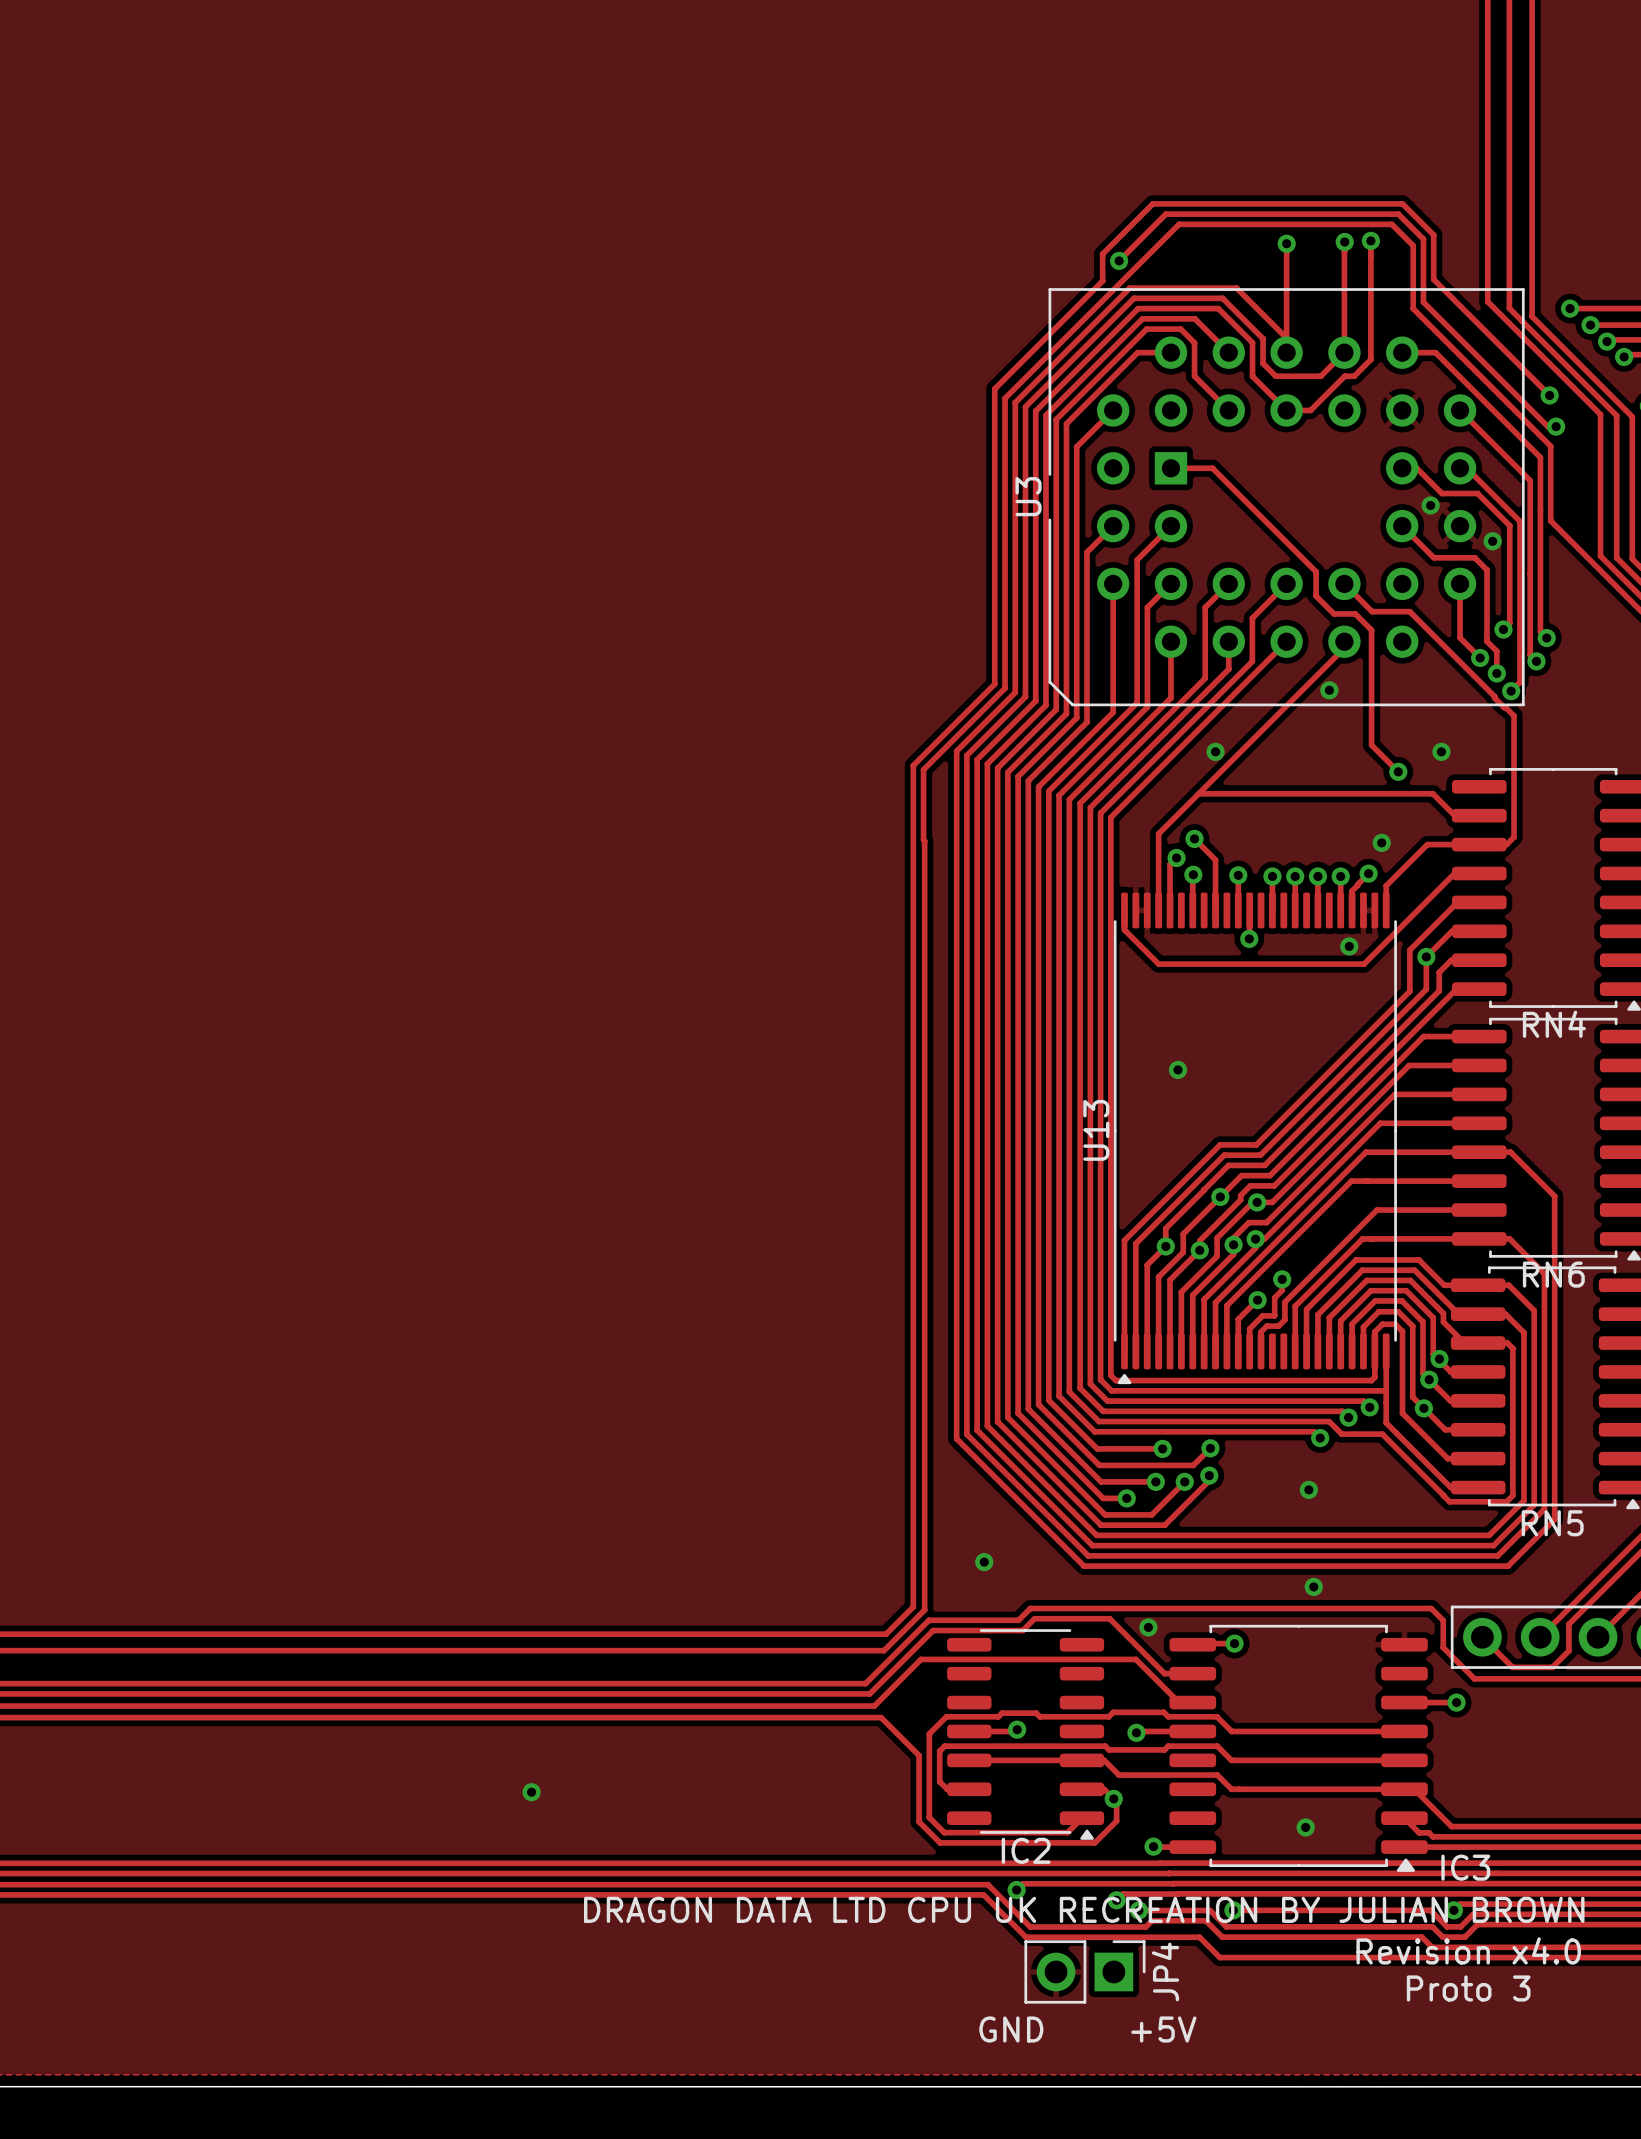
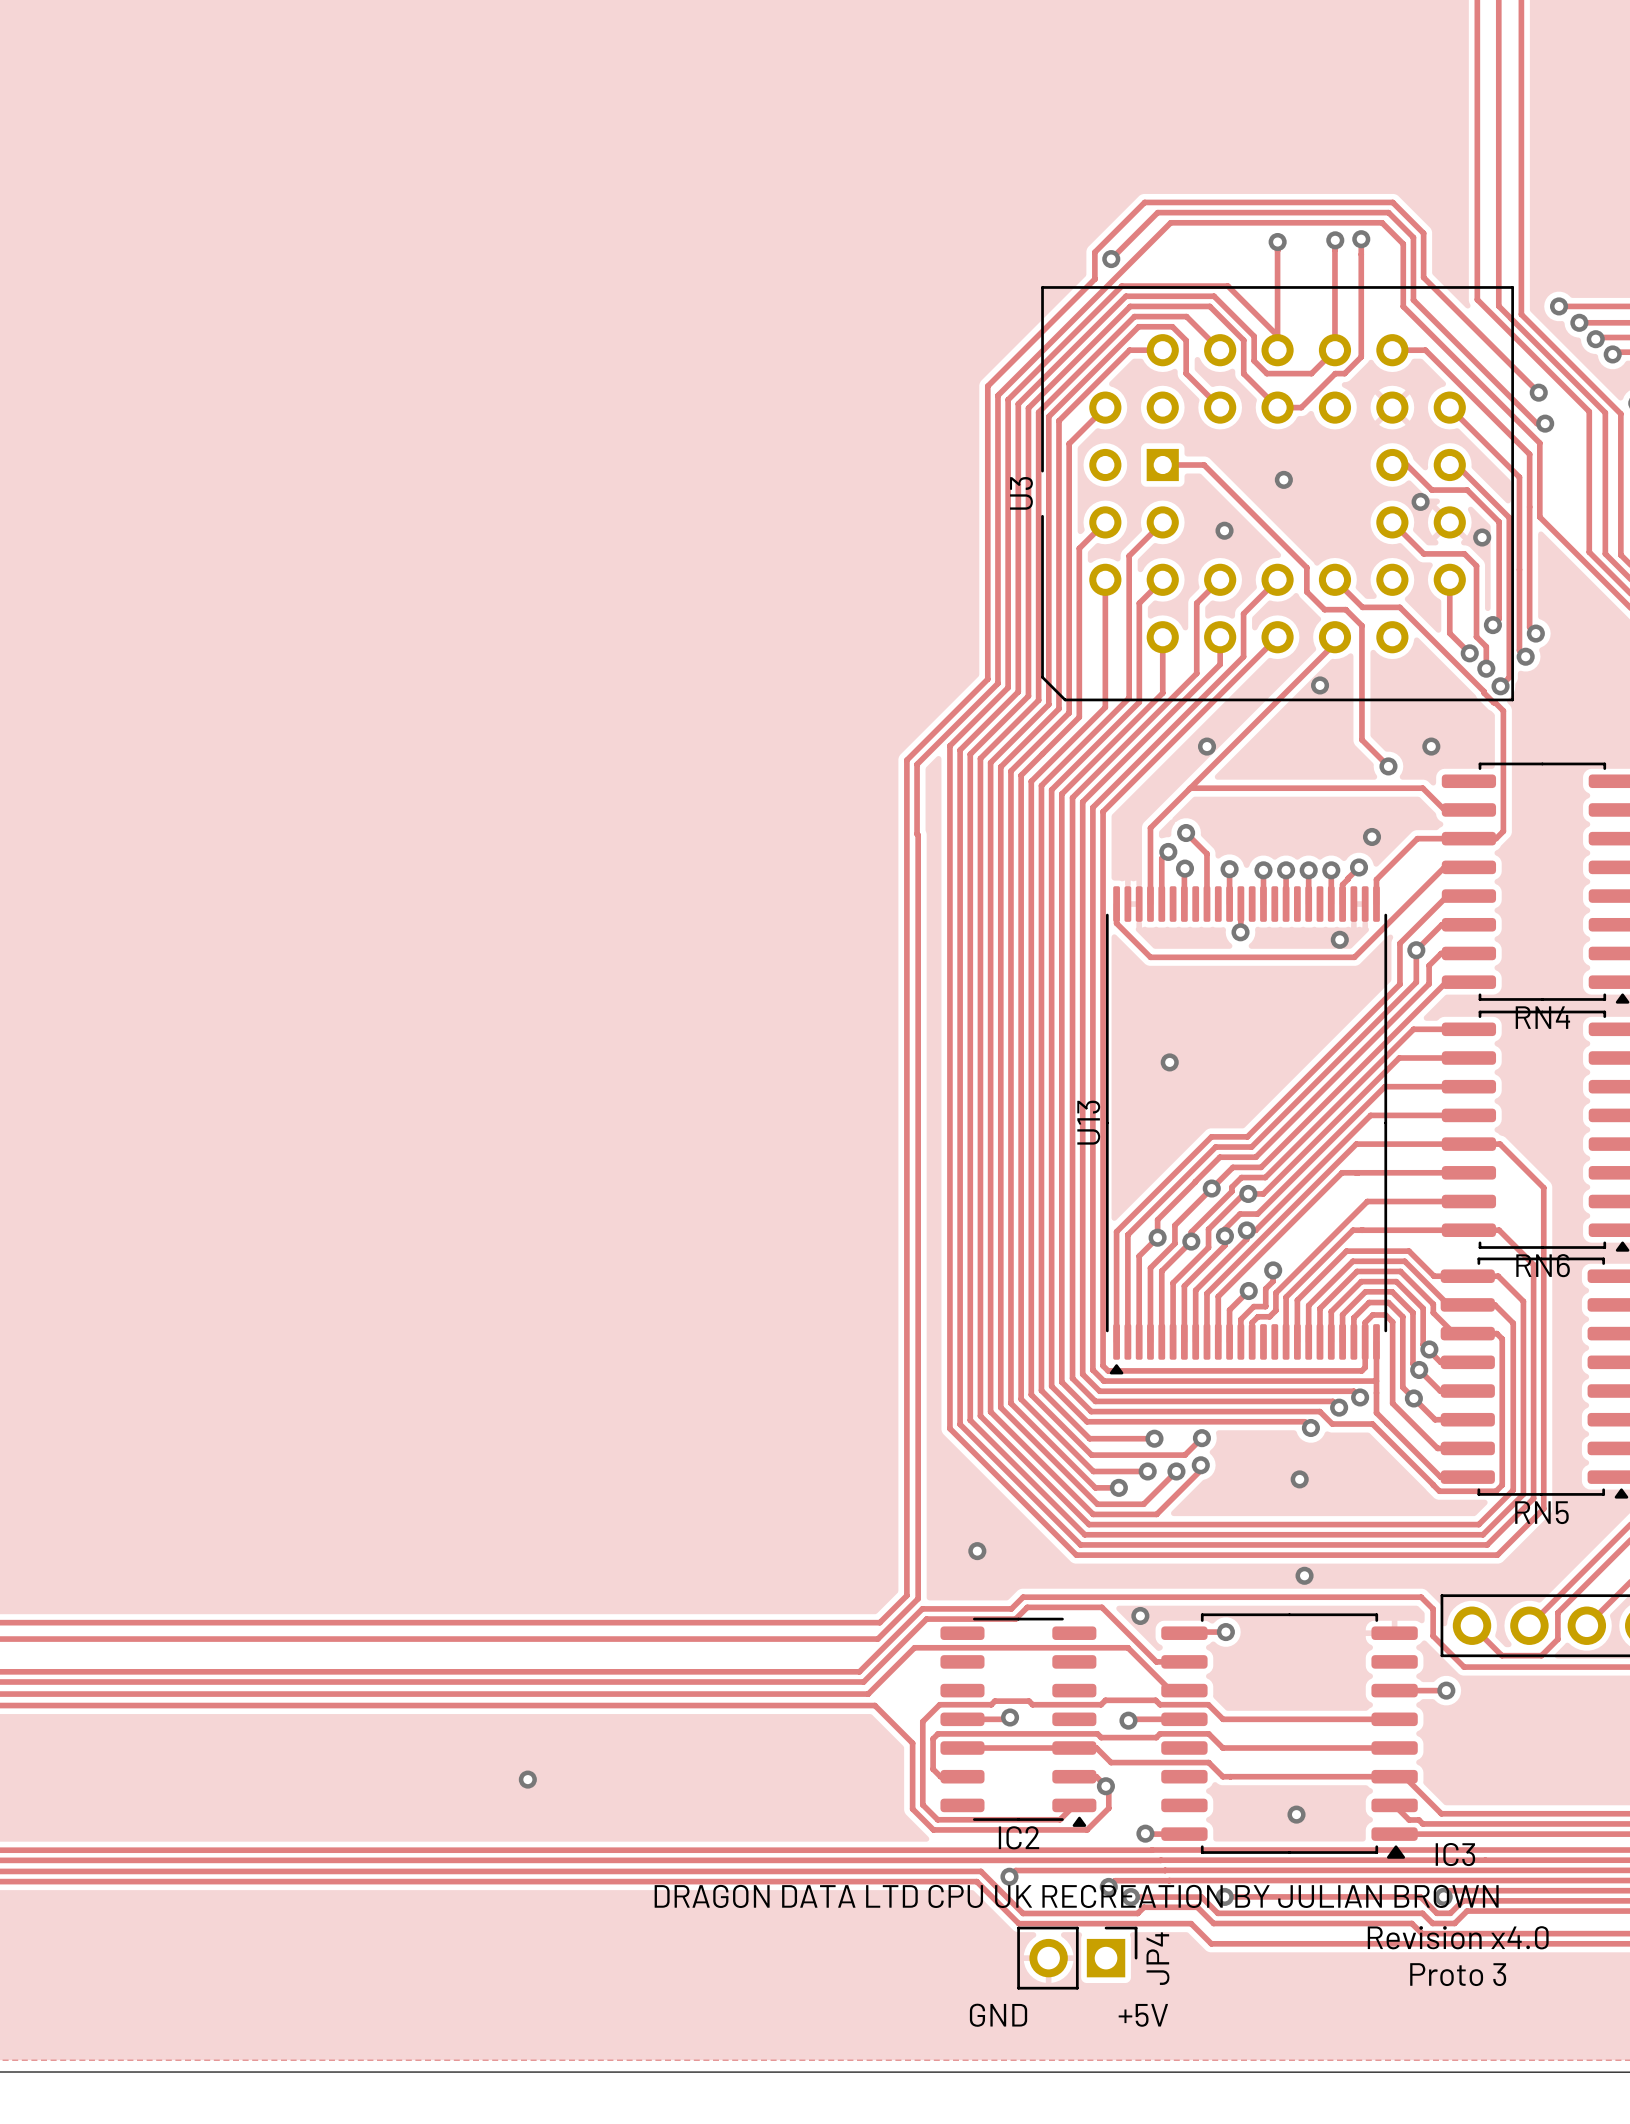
via: none -> (1283, 479)
via: none -> (1224, 530)

